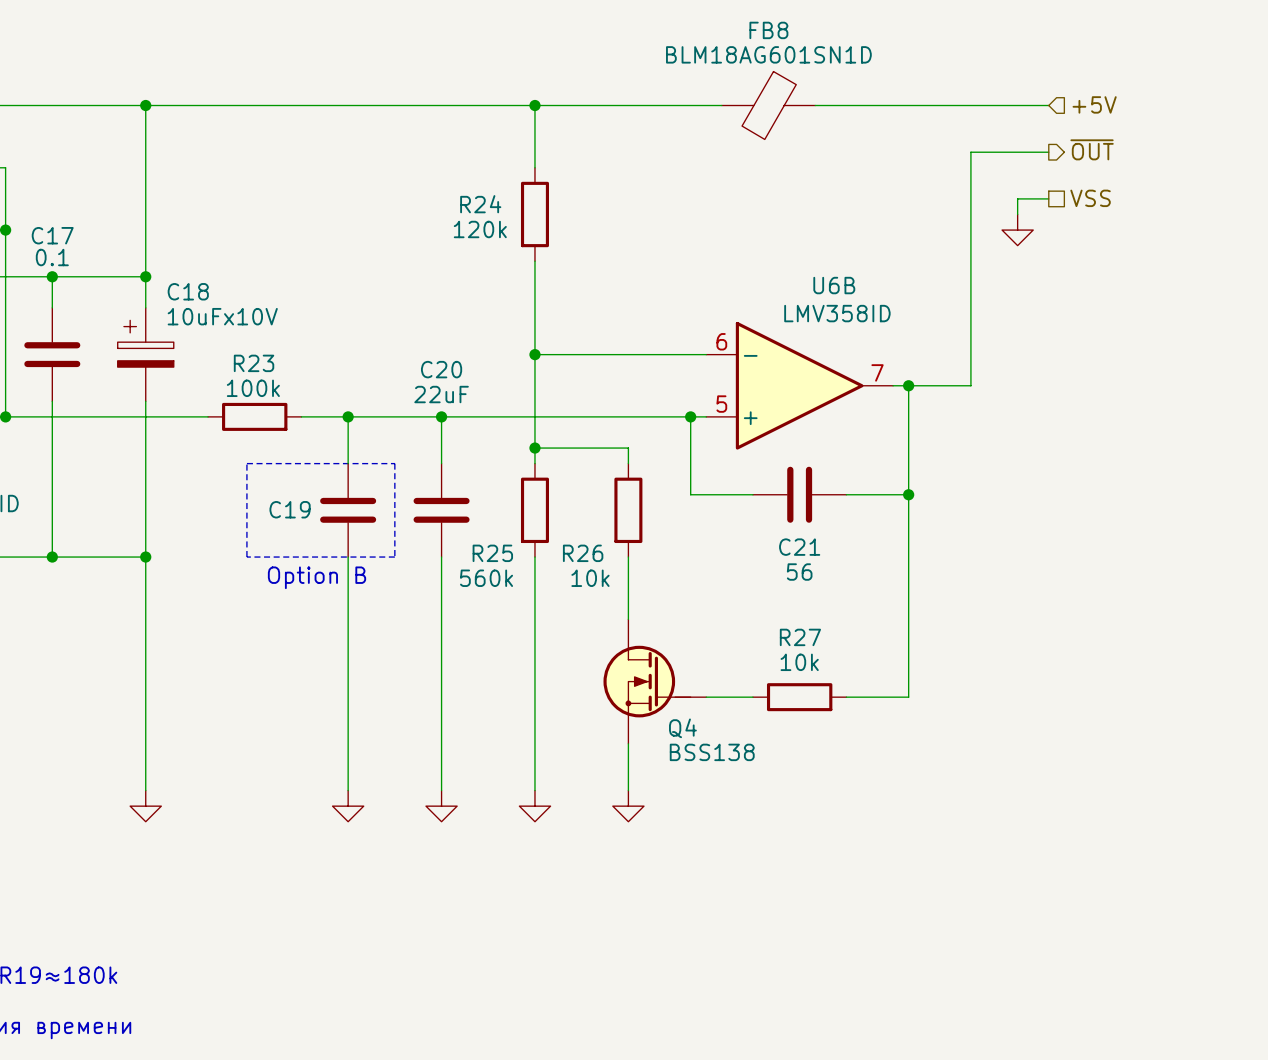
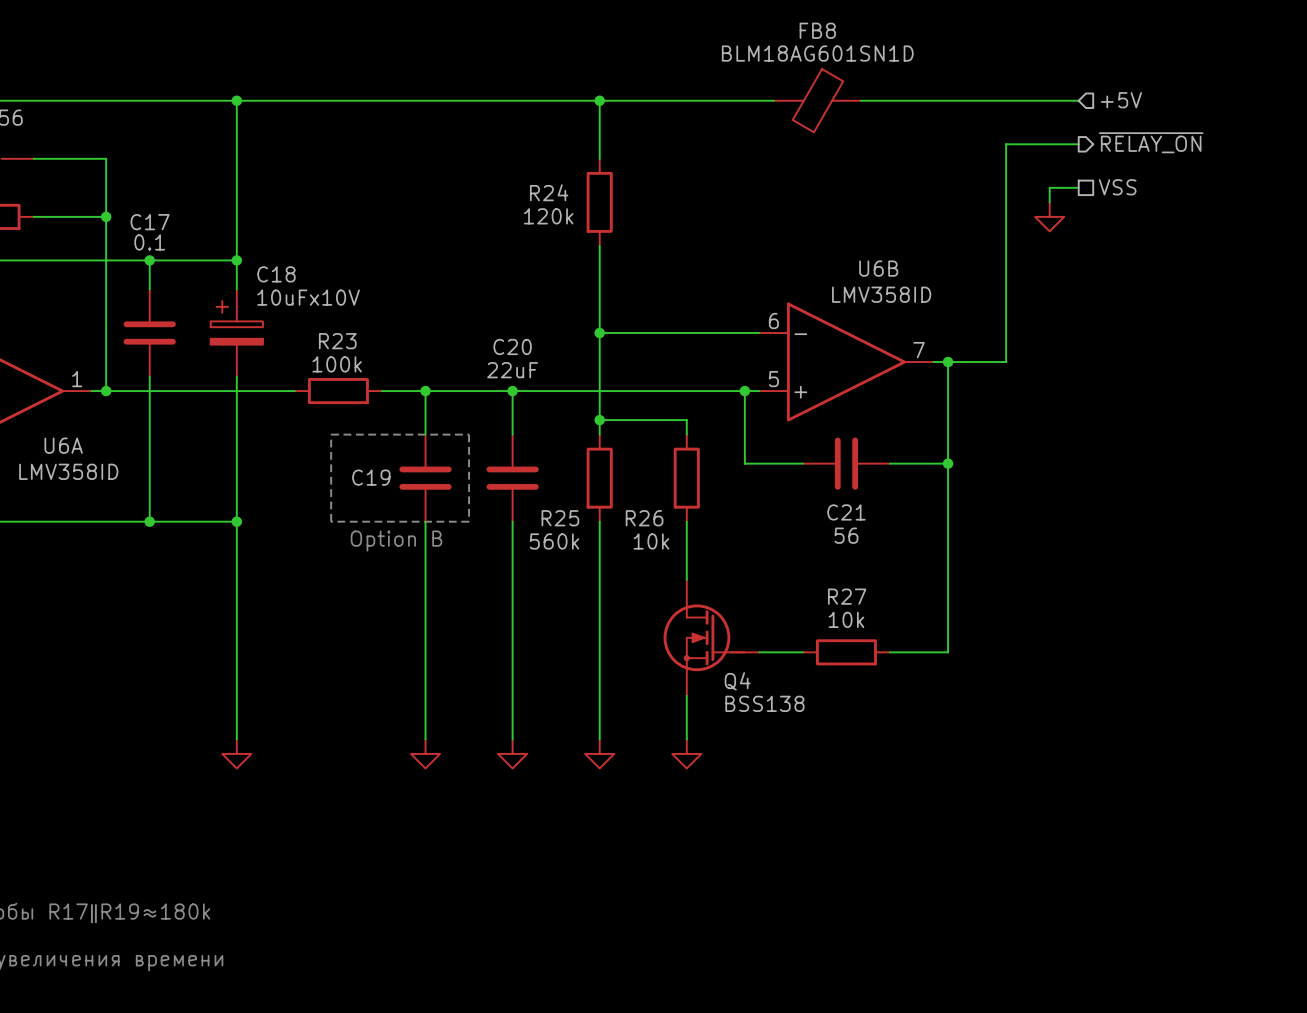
hierarchical label: ~{OUT} (1092, 149) -> ~{RELAY_ON} (1151, 142)

